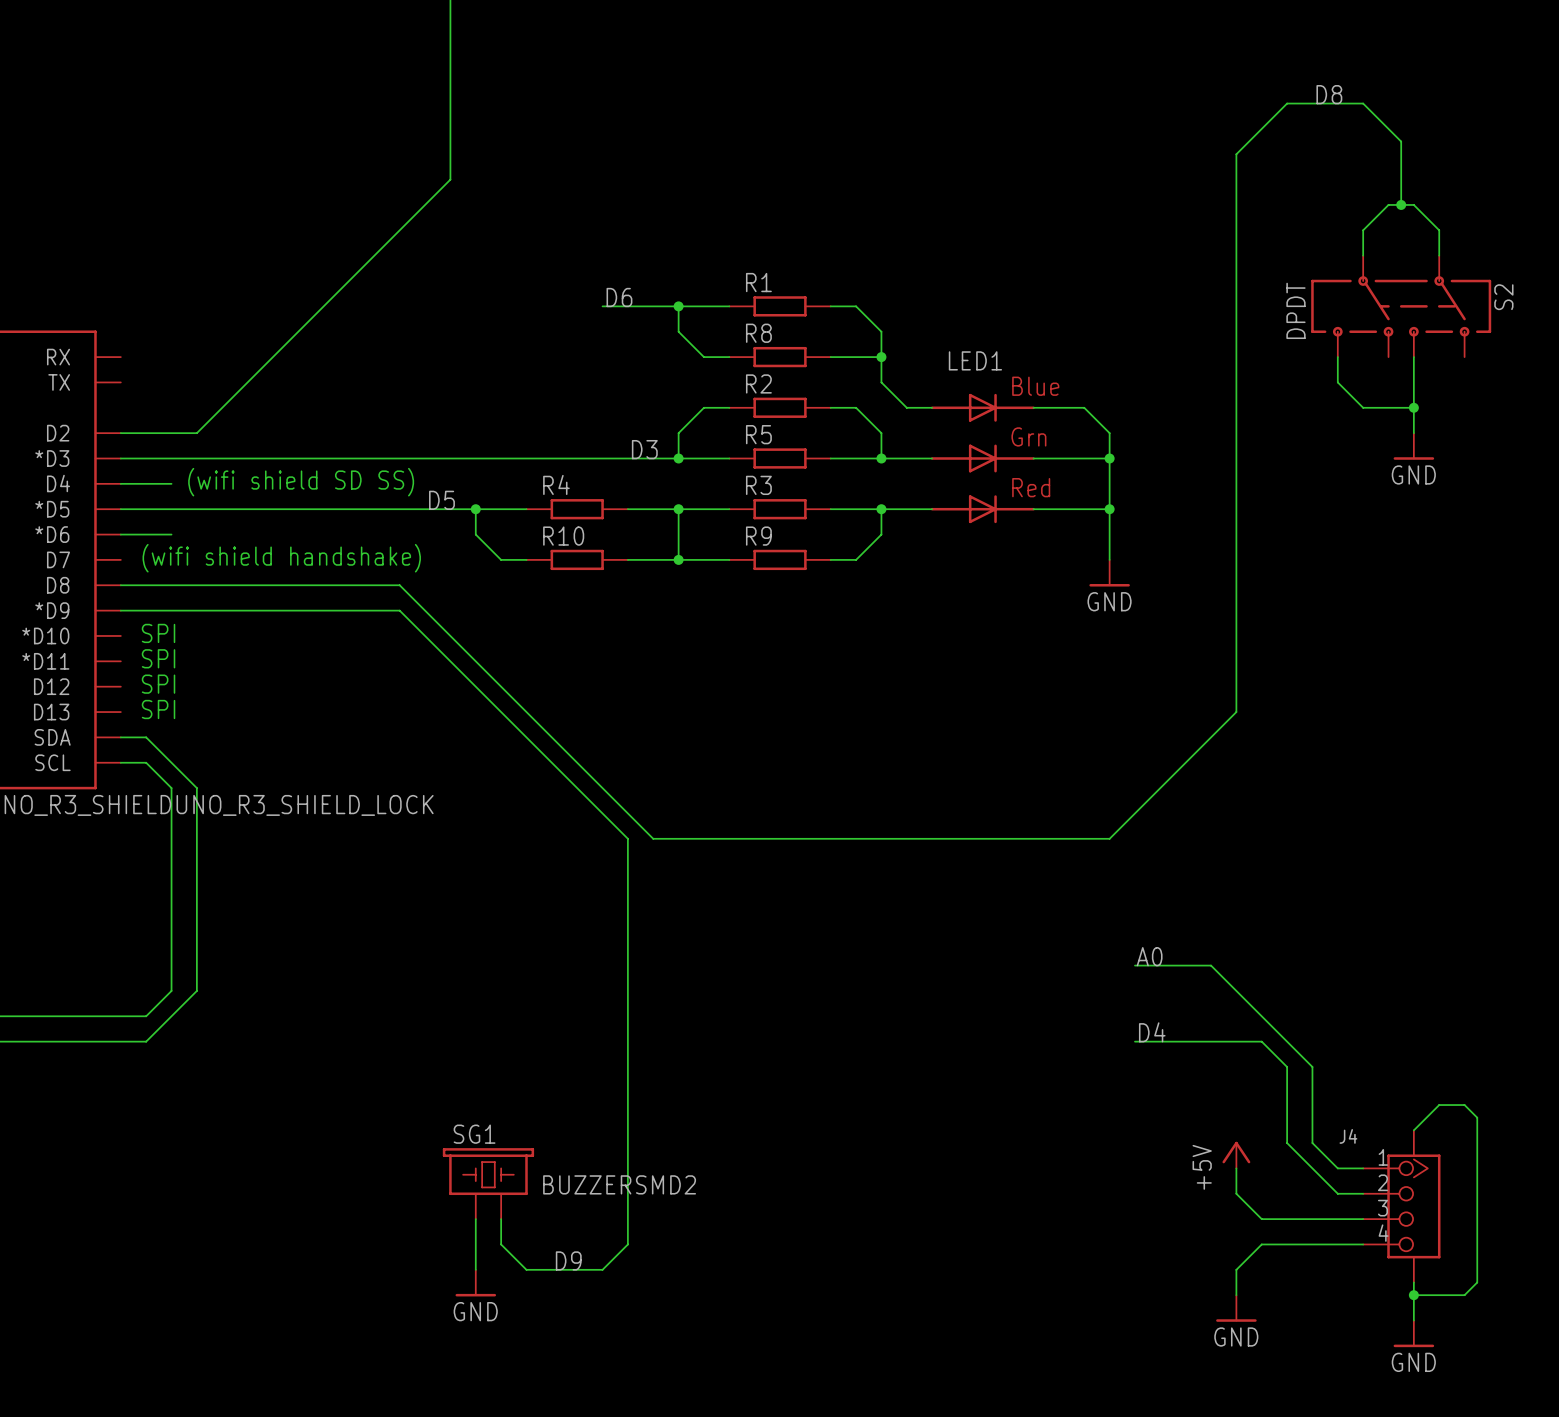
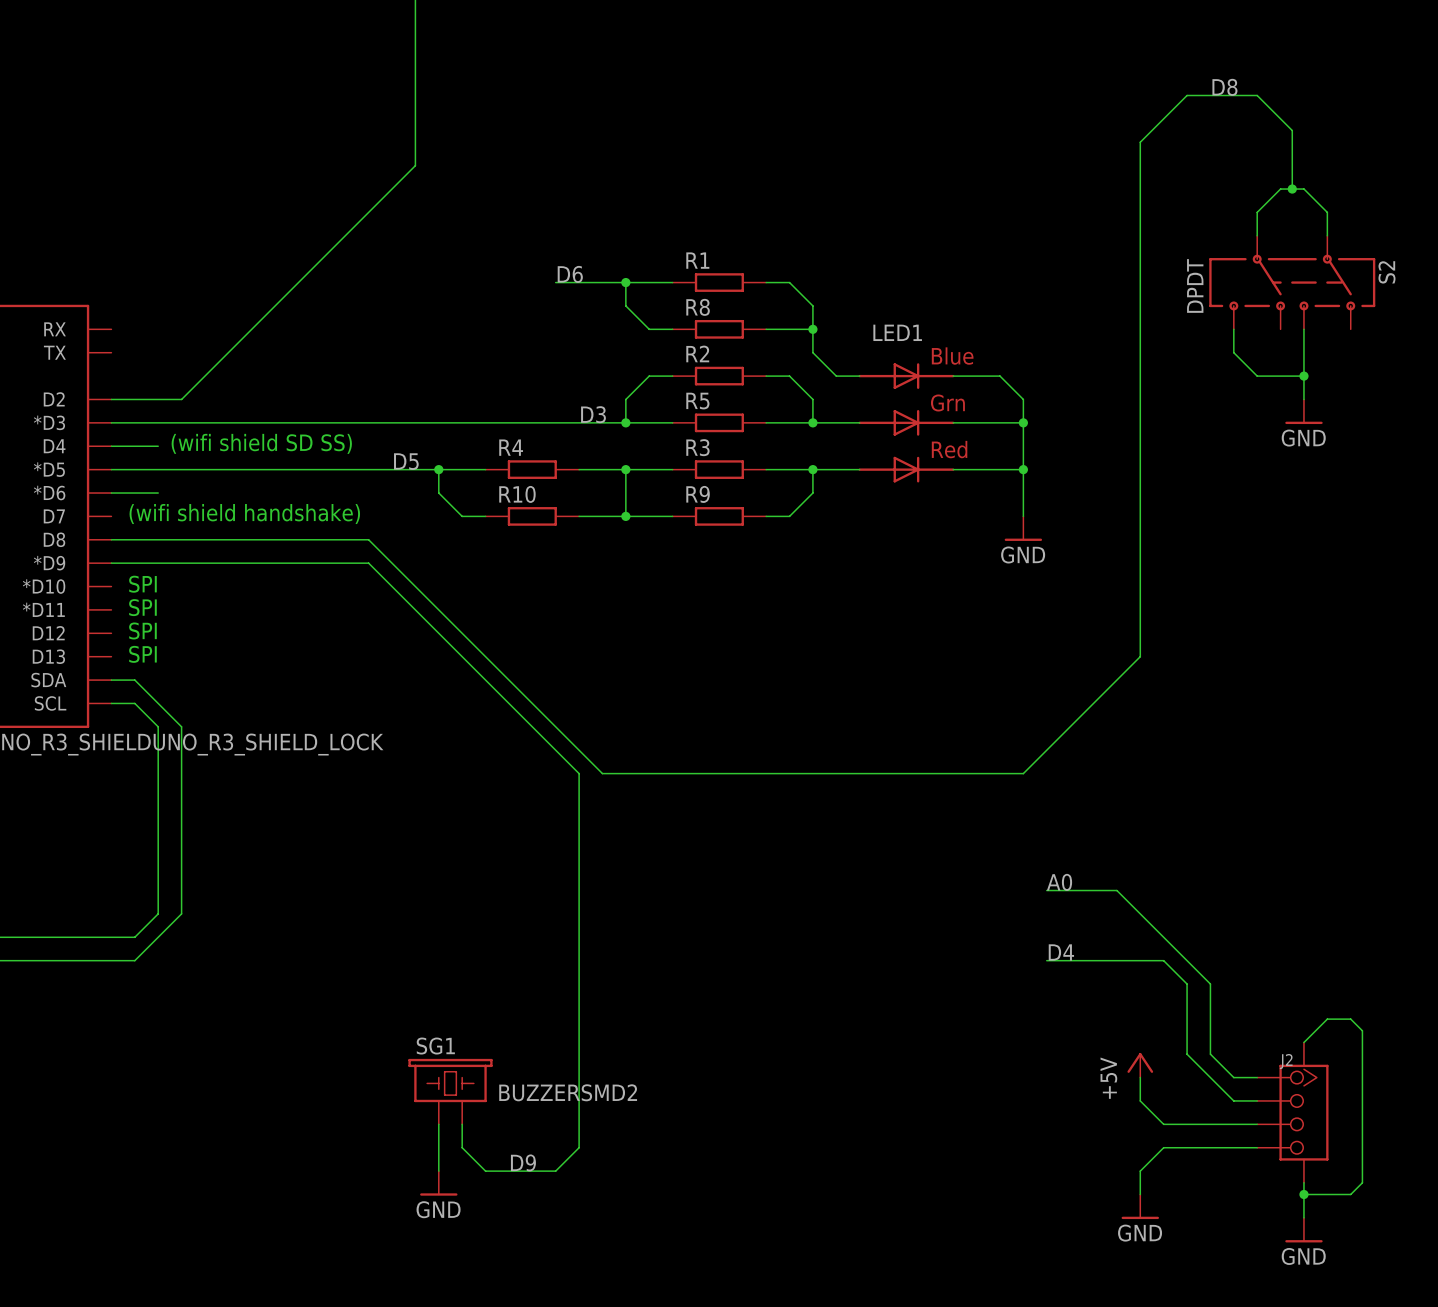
J4 name: J4 (1348, 1136) -> J2 (1286, 1061)
J4 pin number: 1 (1383, 1157) -> none
J4 pin number: 2 (1382, 1182) -> none
J4 pin number: 3 (1382, 1208) -> none
J4 pin number: 4 (1383, 1233) -> none

